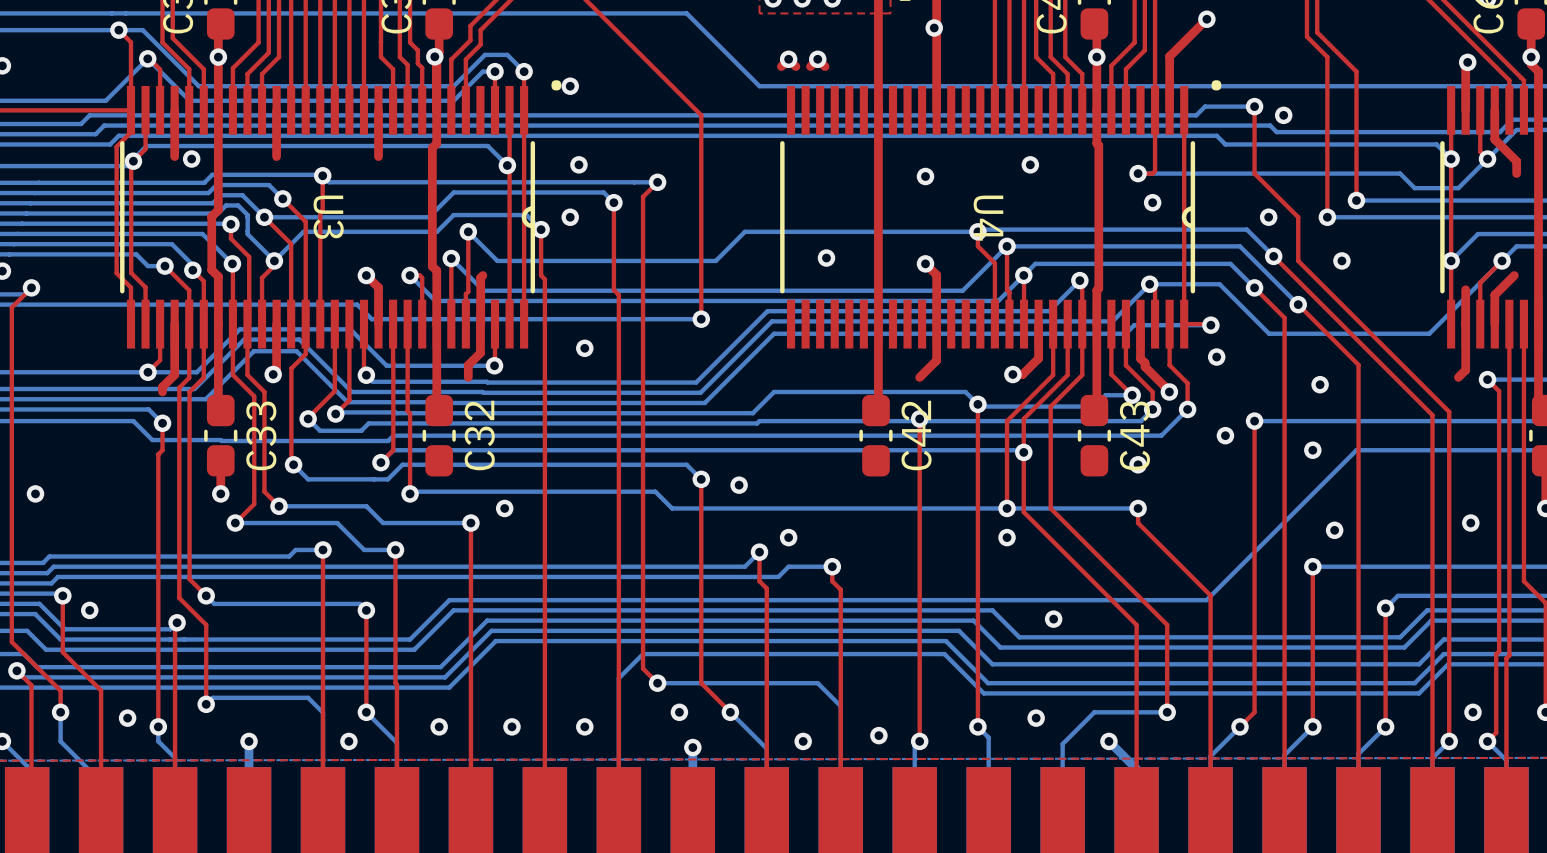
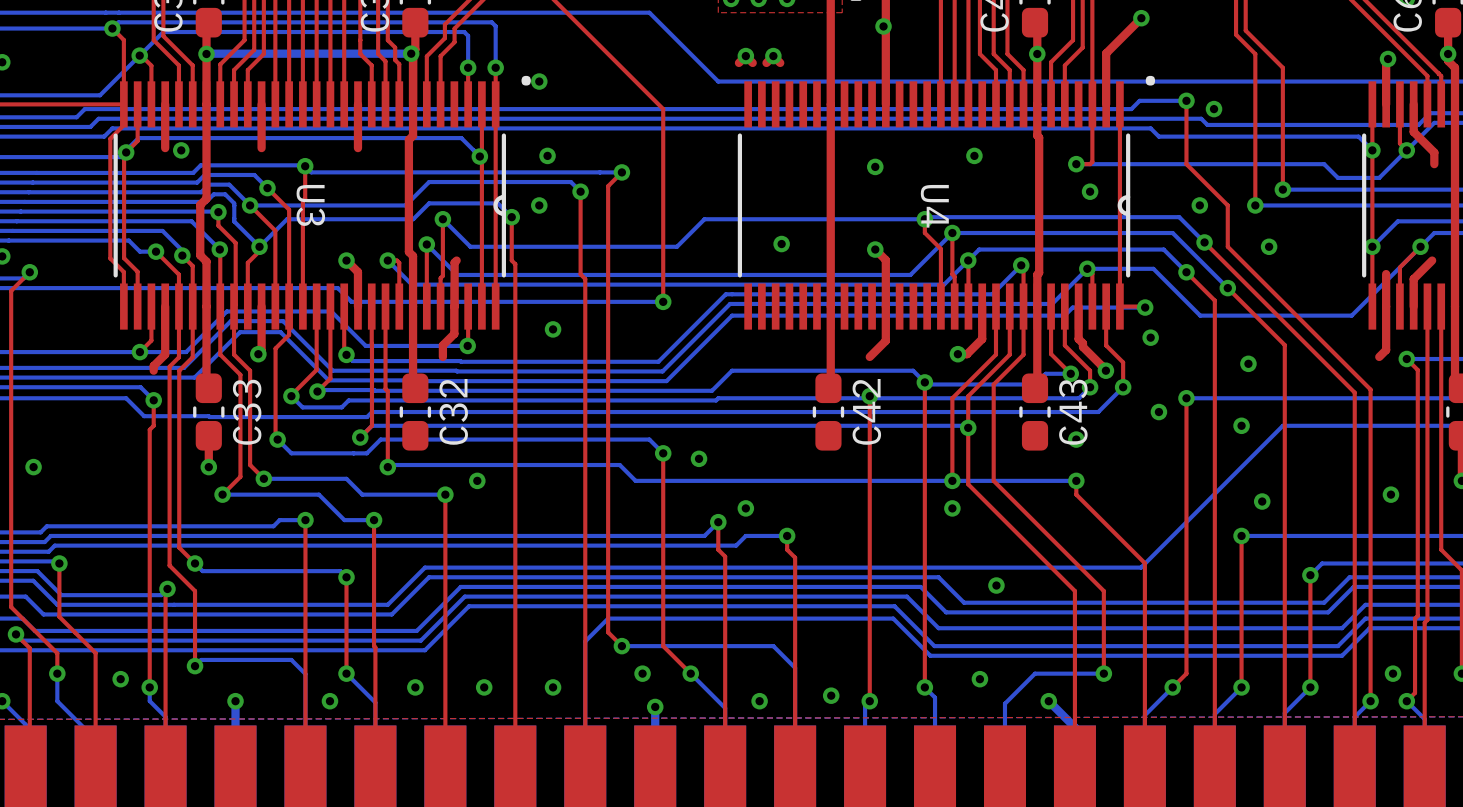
bottom track: (118, 30) (142, 30) (198, 86) (453, 86) (485, 54) (507, 54) (524, 71) -> (112, 28) (118, 22) (491, 22) (495, 26) (495, 67)
bottom track: none -> (206, 53) (411, 53)
bottom track: (147, 58) (189, 100) (453, 100) (482, 71) (495, 71) -> (139, 55) (163, 32) (464, 32) (468, 35) (468, 67)
via: (89, 610) -> none

